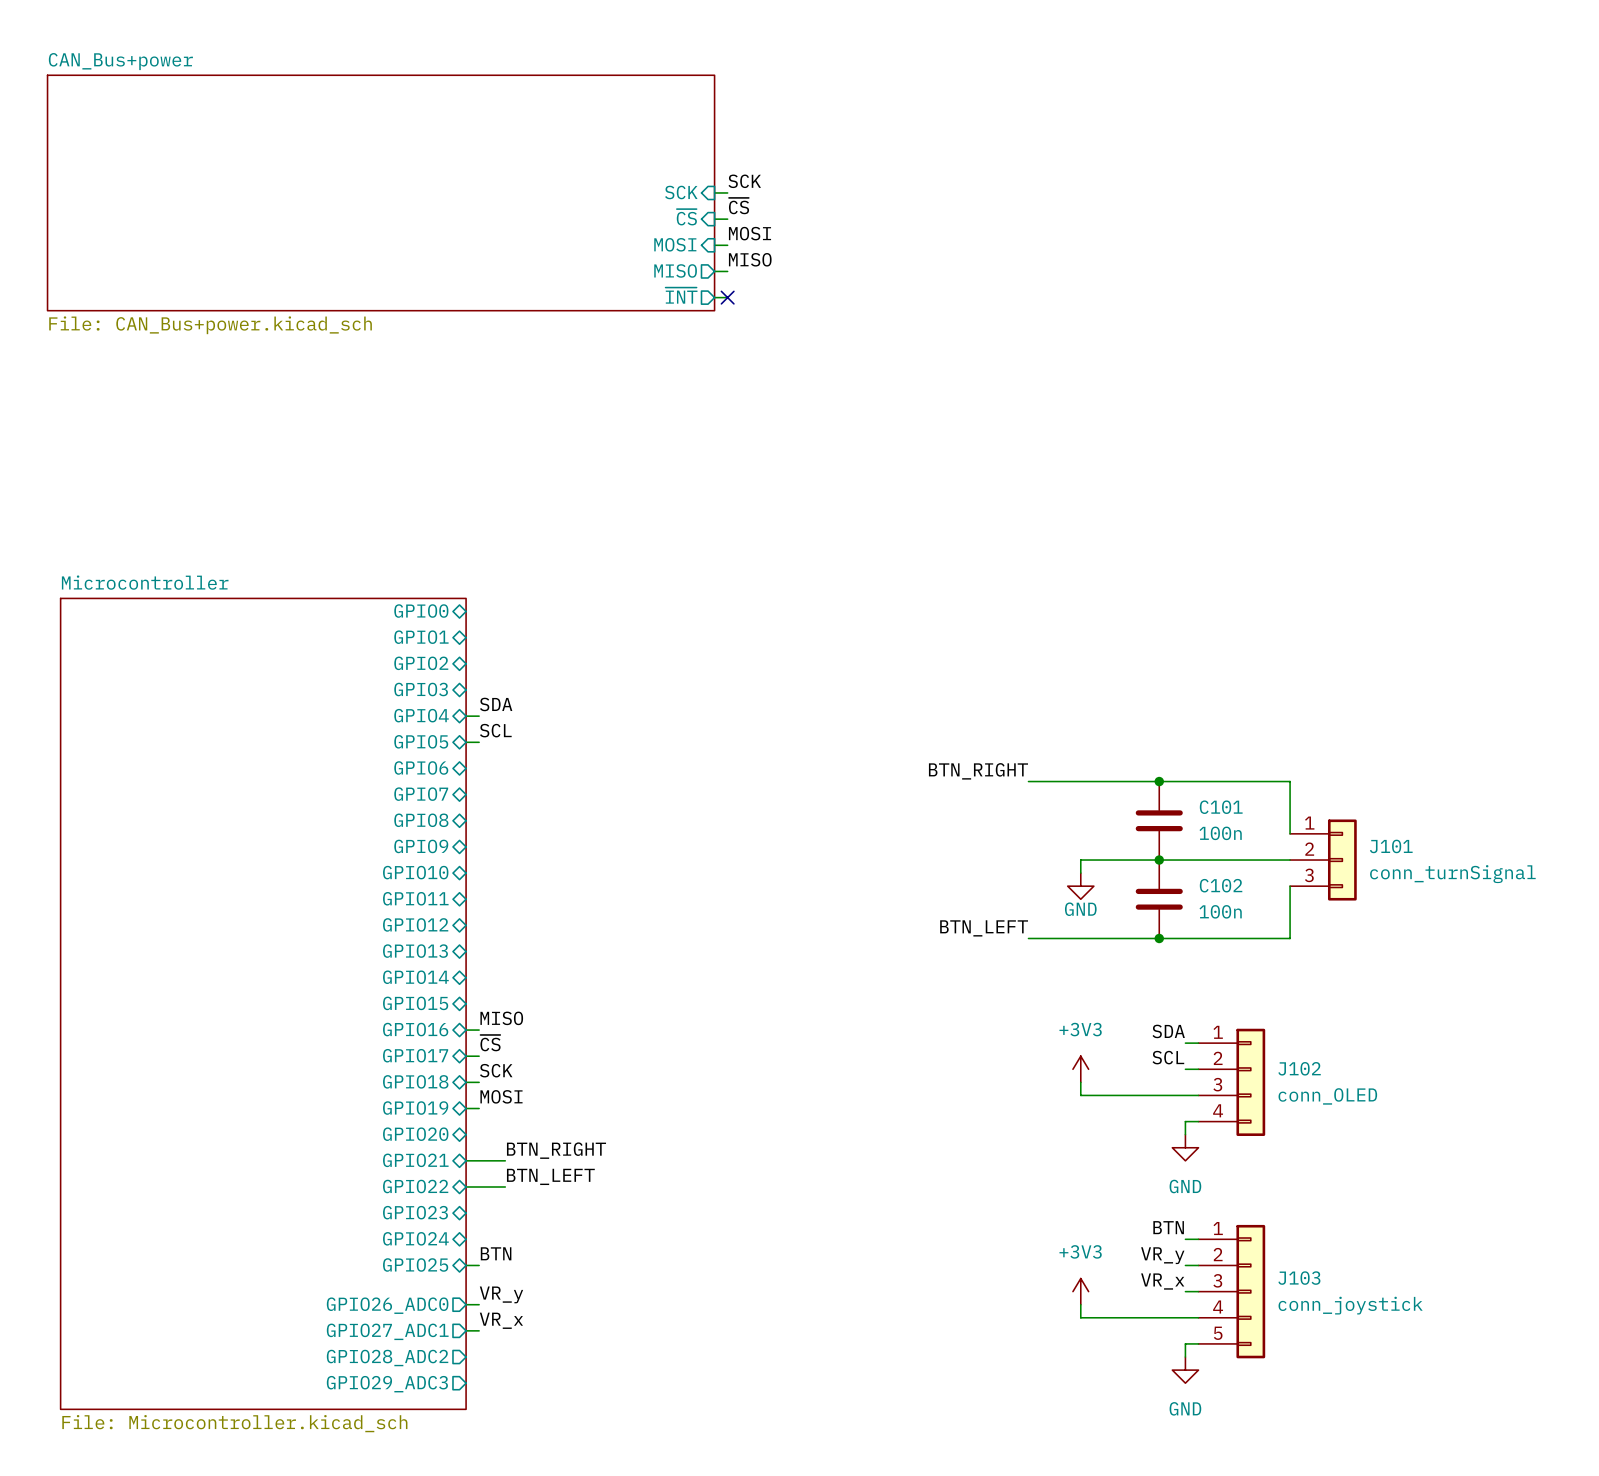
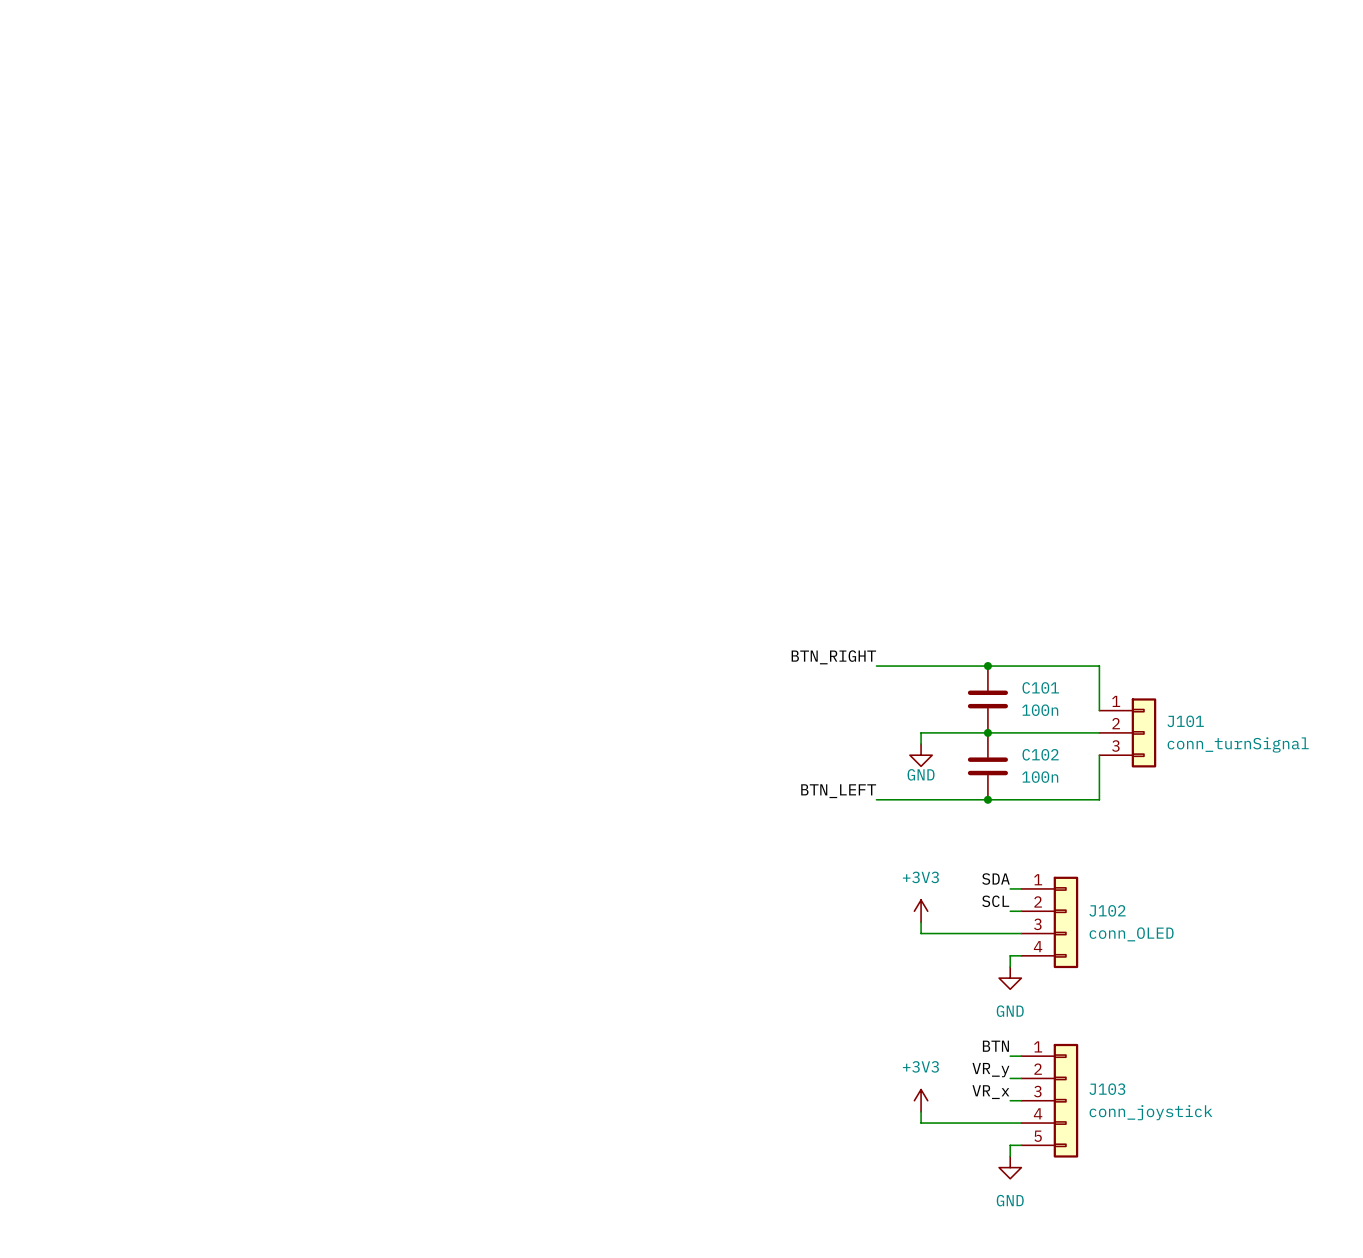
label: SCK (744, 181) -> none
sheet CAN_Bus+power: File: CAN_Bus+power.kicad_sch (381, 192) -> none
sheet pin: SCK (681, 192) -> none
wire: (714, 192) (727, 192) -> none
label: ~{CS} (739, 206) -> none
sheet pin: ~{CS} (686, 217) -> none
wire: (714, 219) (727, 219) -> none
label: MOSI (749, 233) -> none
sheet pin: MOSI (675, 244) -> none
wire: (714, 245) (727, 245) -> none
label: MISO (750, 259) -> none
sheet pin: MISO (675, 270) -> none
wire: (714, 271) (727, 271) -> none
sheet pin: ~{INT} (681, 295) -> none
wire: (714, 297) (727, 297) -> none
no-connect mark: (727, 297) -> none
sheet pin: GPIO0 (421, 611) -> none
sheet pin: GPIO1 (421, 637) -> none
sheet pin: GPIO2 (421, 663) -> none
sheet pin: GPIO3 (421, 689) -> none
label: SDA (496, 704) -> none
sheet pin: GPIO4 (421, 715) -> none
wire: (466, 716) (479, 716) -> none
label: SCL (495, 730) -> none
sheet pin: GPIO5 (421, 741) -> none
wire: (466, 742) (479, 742) -> none
sheet pin: GPIO6 (421, 767) -> none
sheet pin: GPIO7 (421, 794) -> none
sheet pin: GPIO8 (421, 820) -> none
sheet pin: GPIO9 (421, 846) -> none
sheet pin: GPIO10 (415, 872) -> none
sheet pin: GPIO11 (415, 898) -> none
sheet pin: GPIO12 (415, 924) -> none
sheet pin: GPIO13 (415, 951) -> none
sheet pin: GPIO14 (415, 977) -> none
sheet Microcontroller: File: Microcontroller.kicad_sch (263, 1003) -> none
sheet pin: GPIO15 (415, 1003) -> none
label: MISO (501, 1018) -> none
sheet pin: GPIO16 (415, 1029) -> none
wire: (466, 1030) (479, 1030) -> none
label: ~{CS} (490, 1043) -> none
sheet pin: GPIO17 (415, 1055) -> none
wire: (466, 1056) (479, 1056) -> none
label: SCK (496, 1070) -> none
sheet pin: GPIO18 (415, 1081) -> none
wire: (466, 1082) (479, 1082) -> none
label: MOSI (501, 1096) -> none
sheet pin: GPIO19 (415, 1108) -> none
wire: (466, 1108) (479, 1108) -> none
sheet pin: GPIO20 (415, 1134) -> none
label: BTN_RIGHT (556, 1150) -> none
sheet pin: GPIO21 (415, 1160) -> none
wire: (466, 1160) (505, 1160) -> none
label: BTN_LEFT (550, 1176) -> none
sheet pin: GPIO22 (415, 1186) -> none
wire: (466, 1186) (505, 1186) -> none
sheet pin: GPIO23 (415, 1212) -> none
sheet pin: GPIO24 (415, 1238) -> none
label: BTN (496, 1253) -> none
sheet pin: GPIO25 (415, 1264) -> none
wire: (466, 1265) (479, 1265) -> none
label: VR_y (501, 1294) -> none
wire: (466, 1304) (479, 1304) -> none
sheet pin: GPIO26_ADC0 (387, 1305) -> none
label: VR_x (501, 1320) -> none
wire: (466, 1330) (479, 1330) -> none
sheet pin: GPIO27_ADC1 (387, 1331) -> none
sheet pin: GPIO28_ADC2 (387, 1358) -> none
sheet pin: GPIO29_ADC3 (387, 1384) -> none

